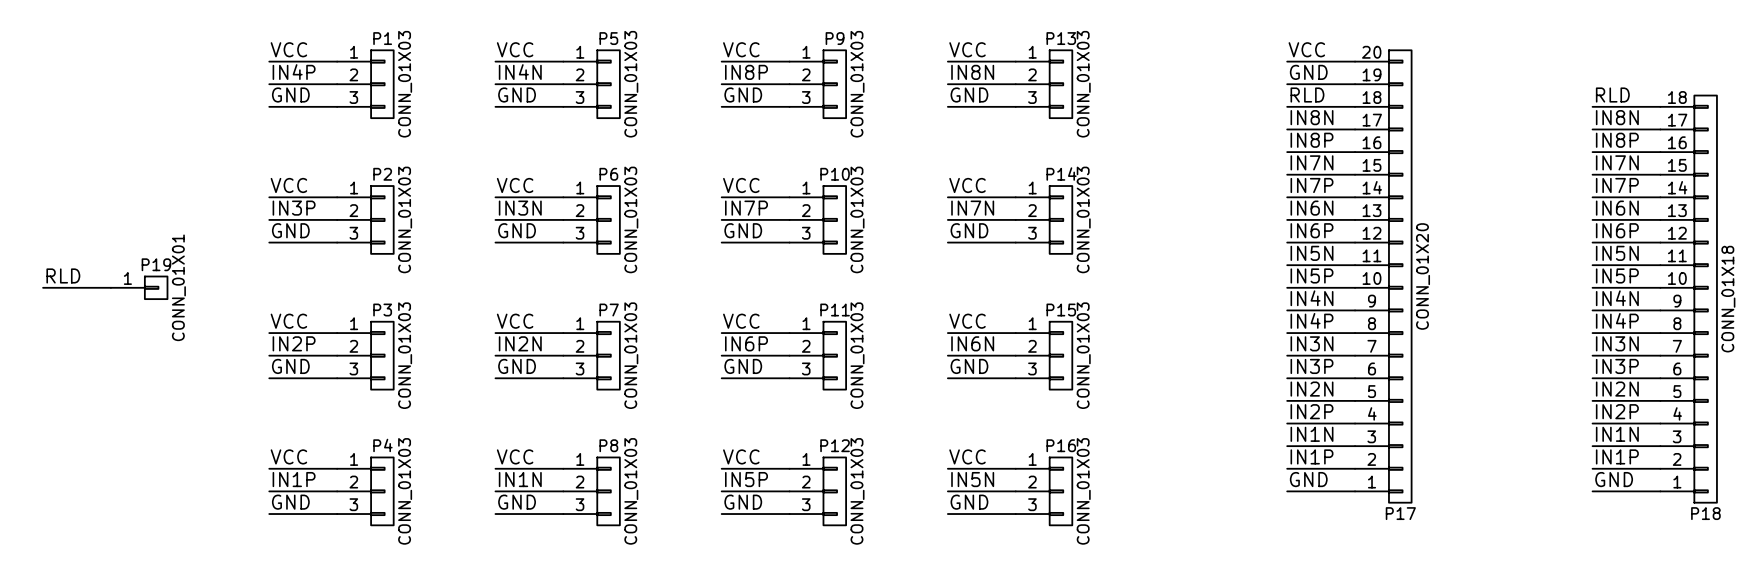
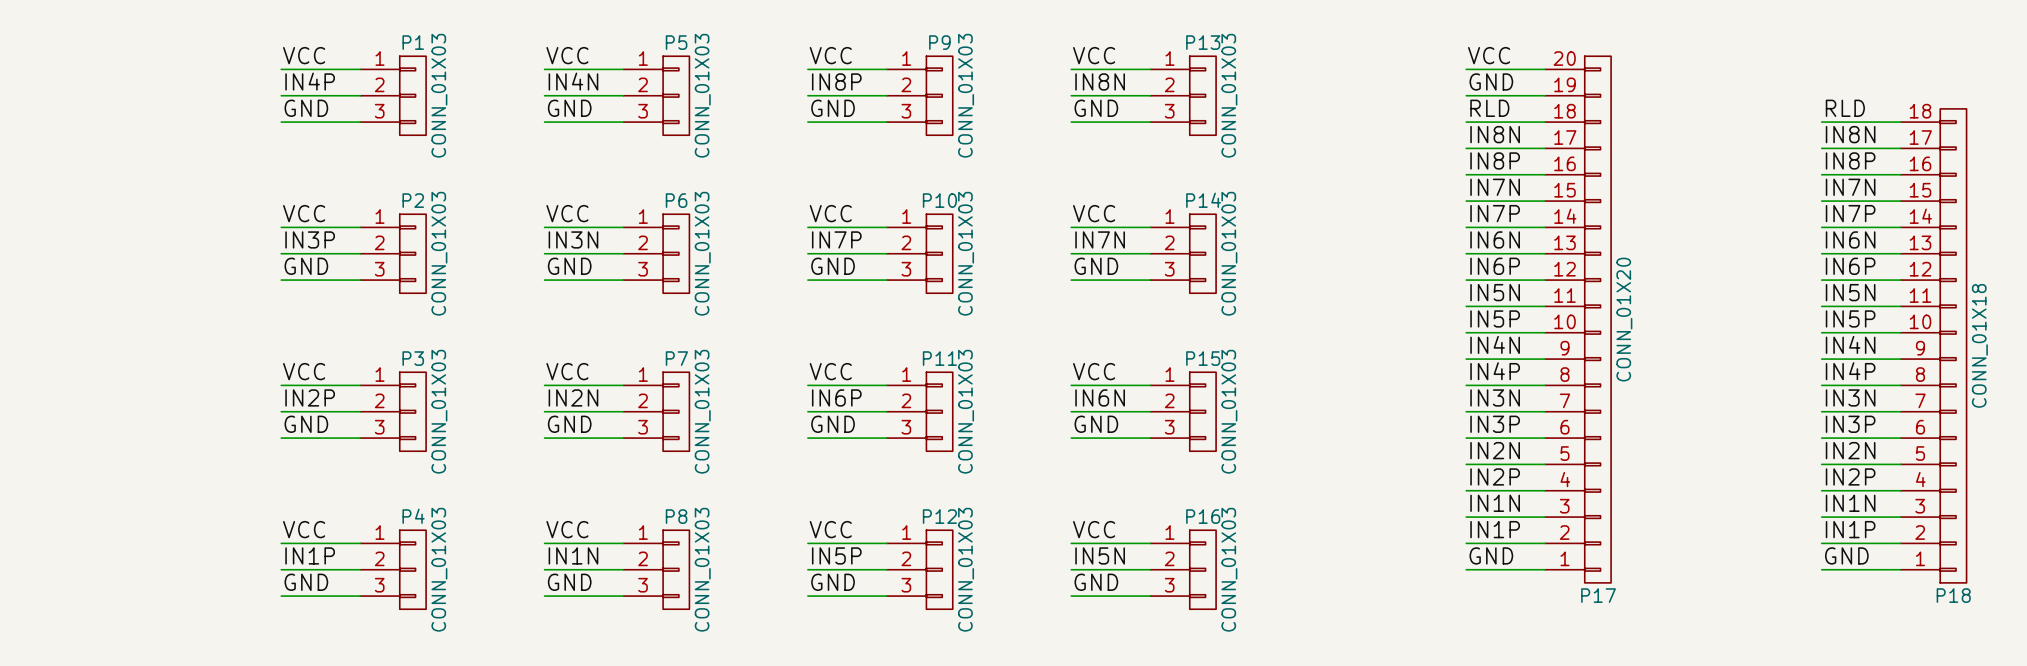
label: RLD (63, 275) -> none
wire: (43, 287) (110, 287) -> none
P19: CONN_01X01 (139, 287) -> none

